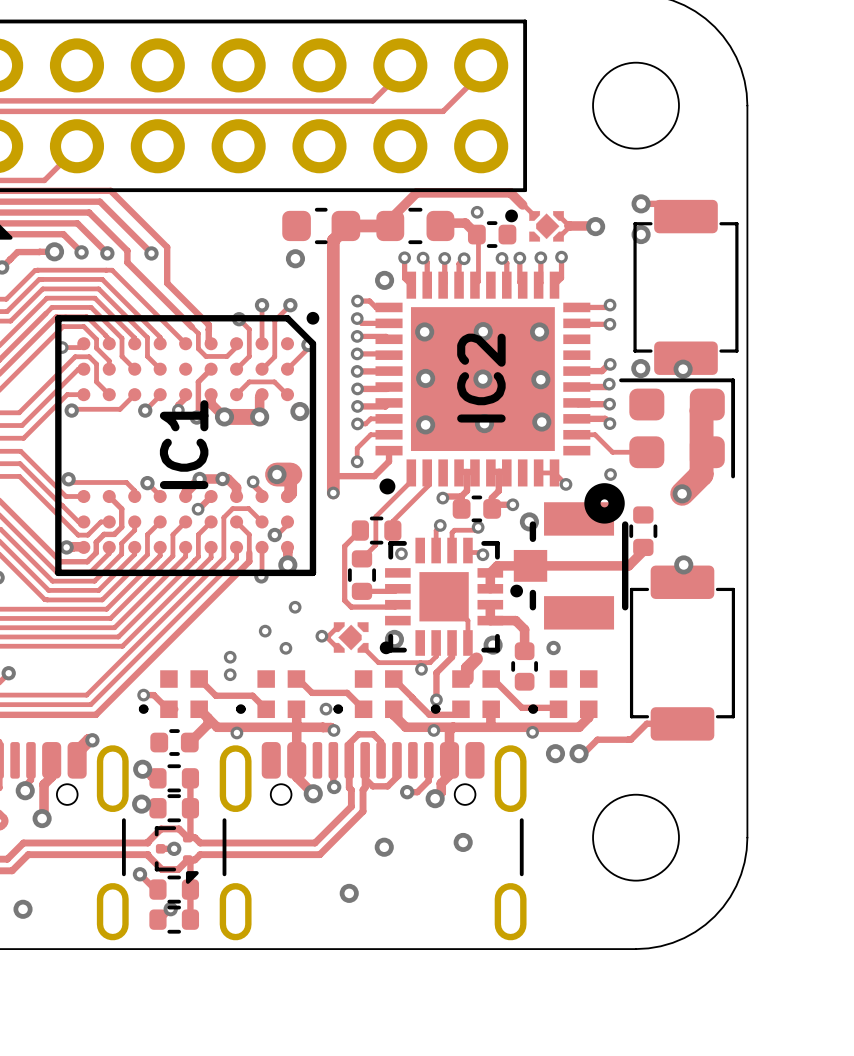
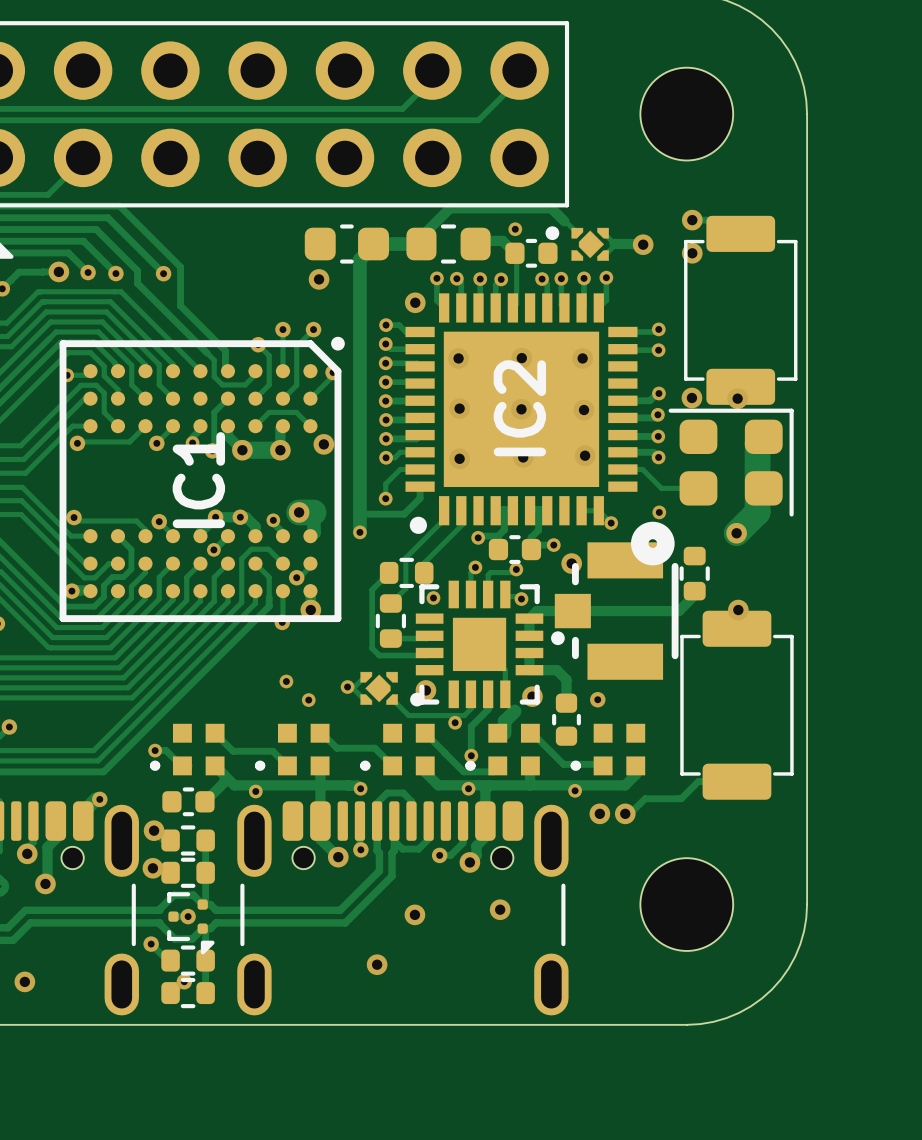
via: (295, 607) -> none
via: (230, 657) -> none
via: (230, 674) -> none
via: (326, 709) -> none

